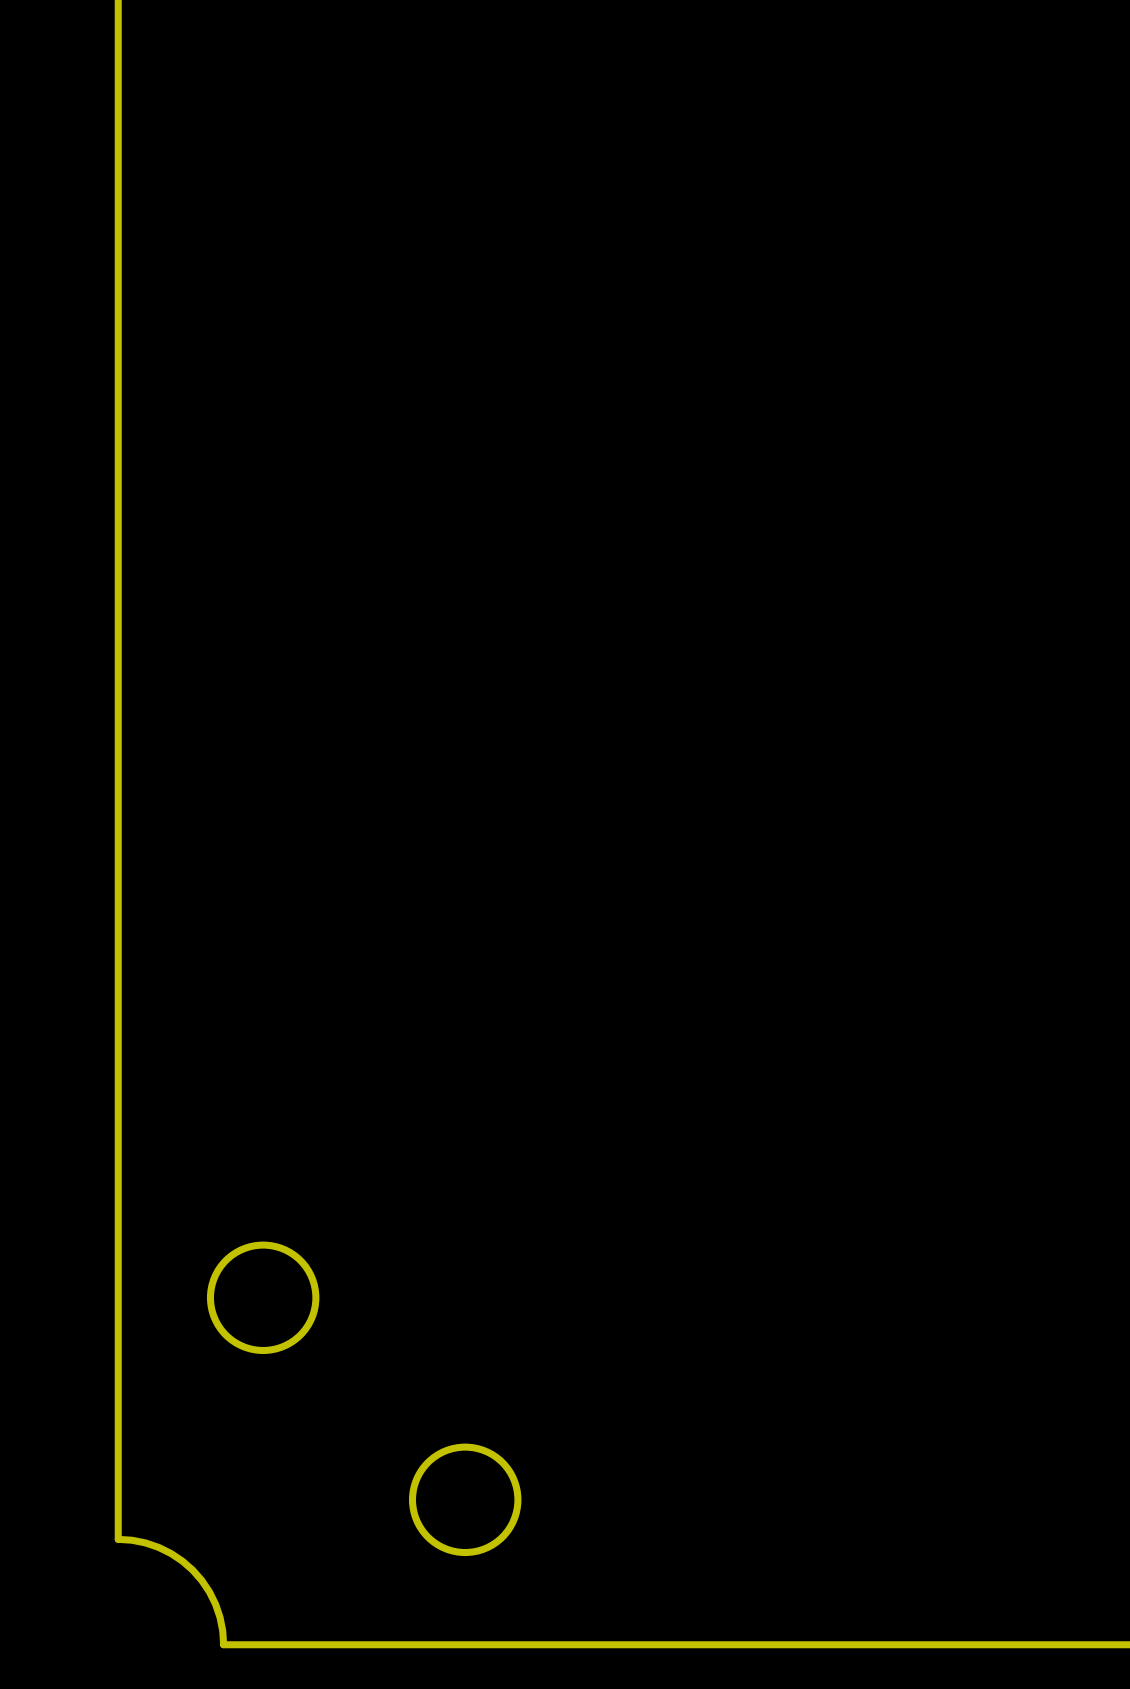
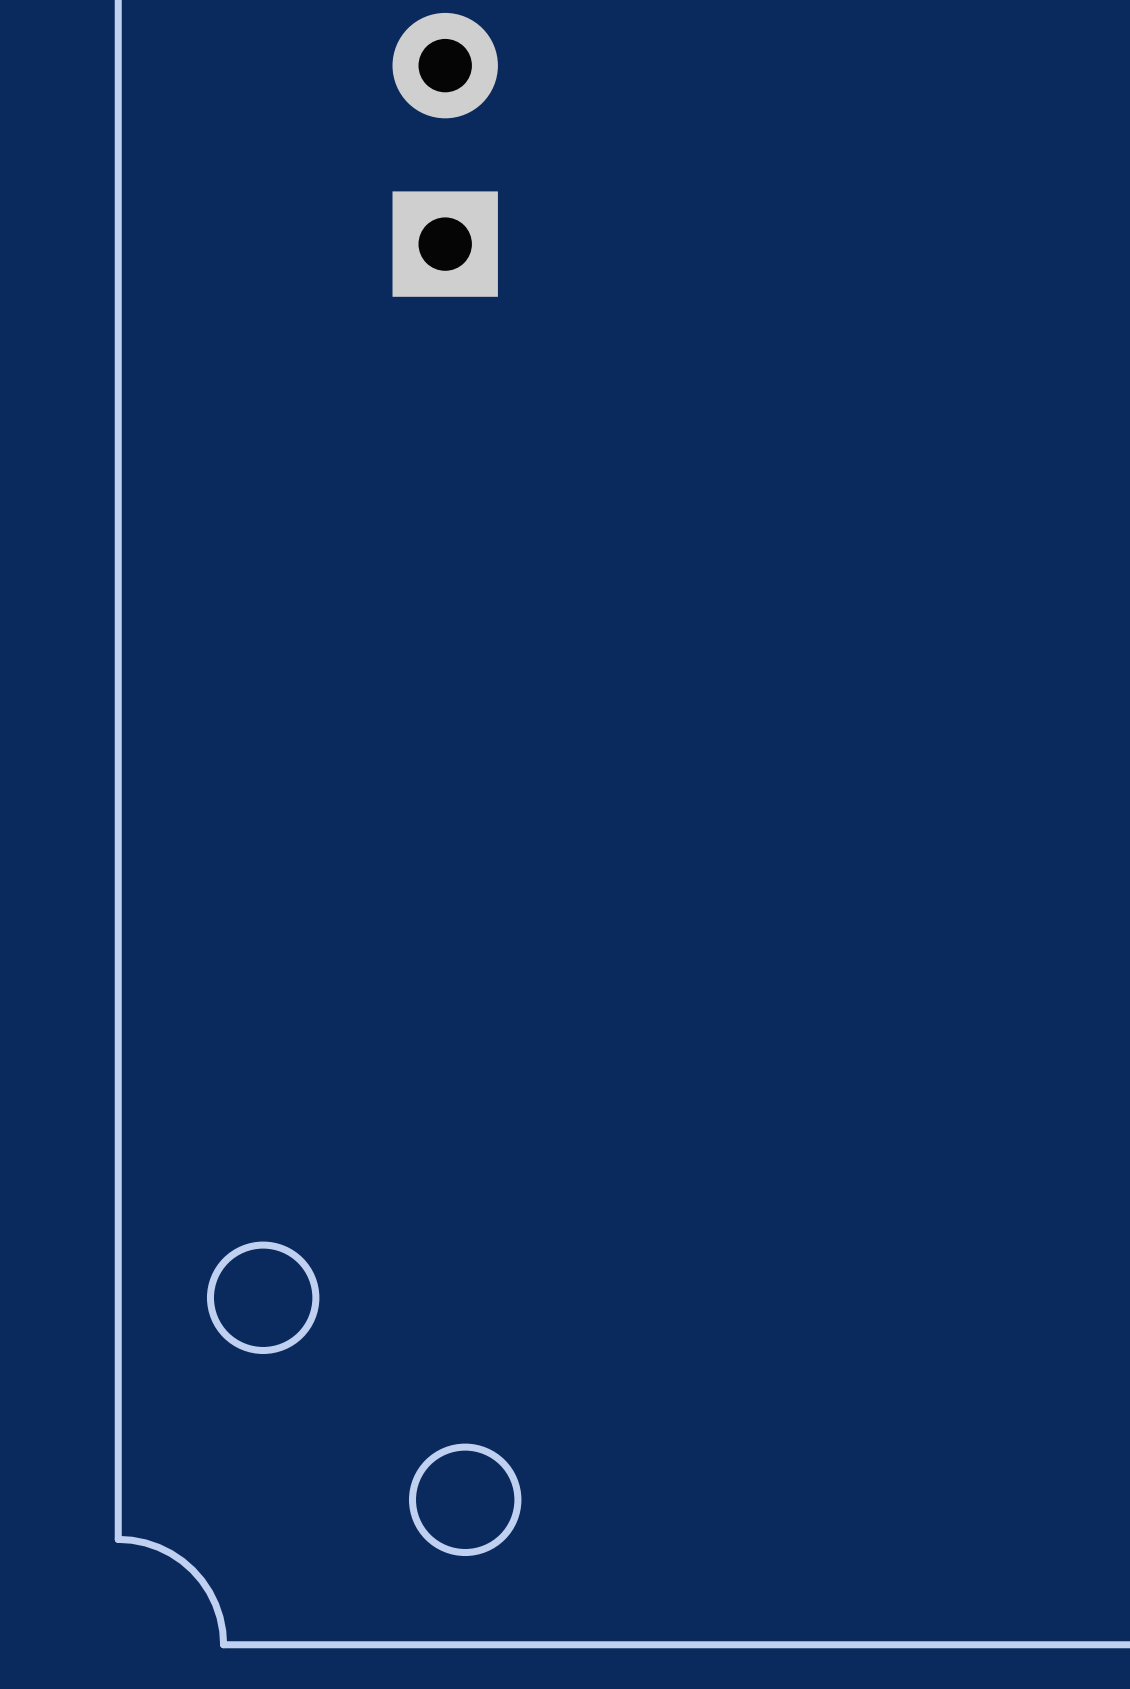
part: none -> (445, 154)

